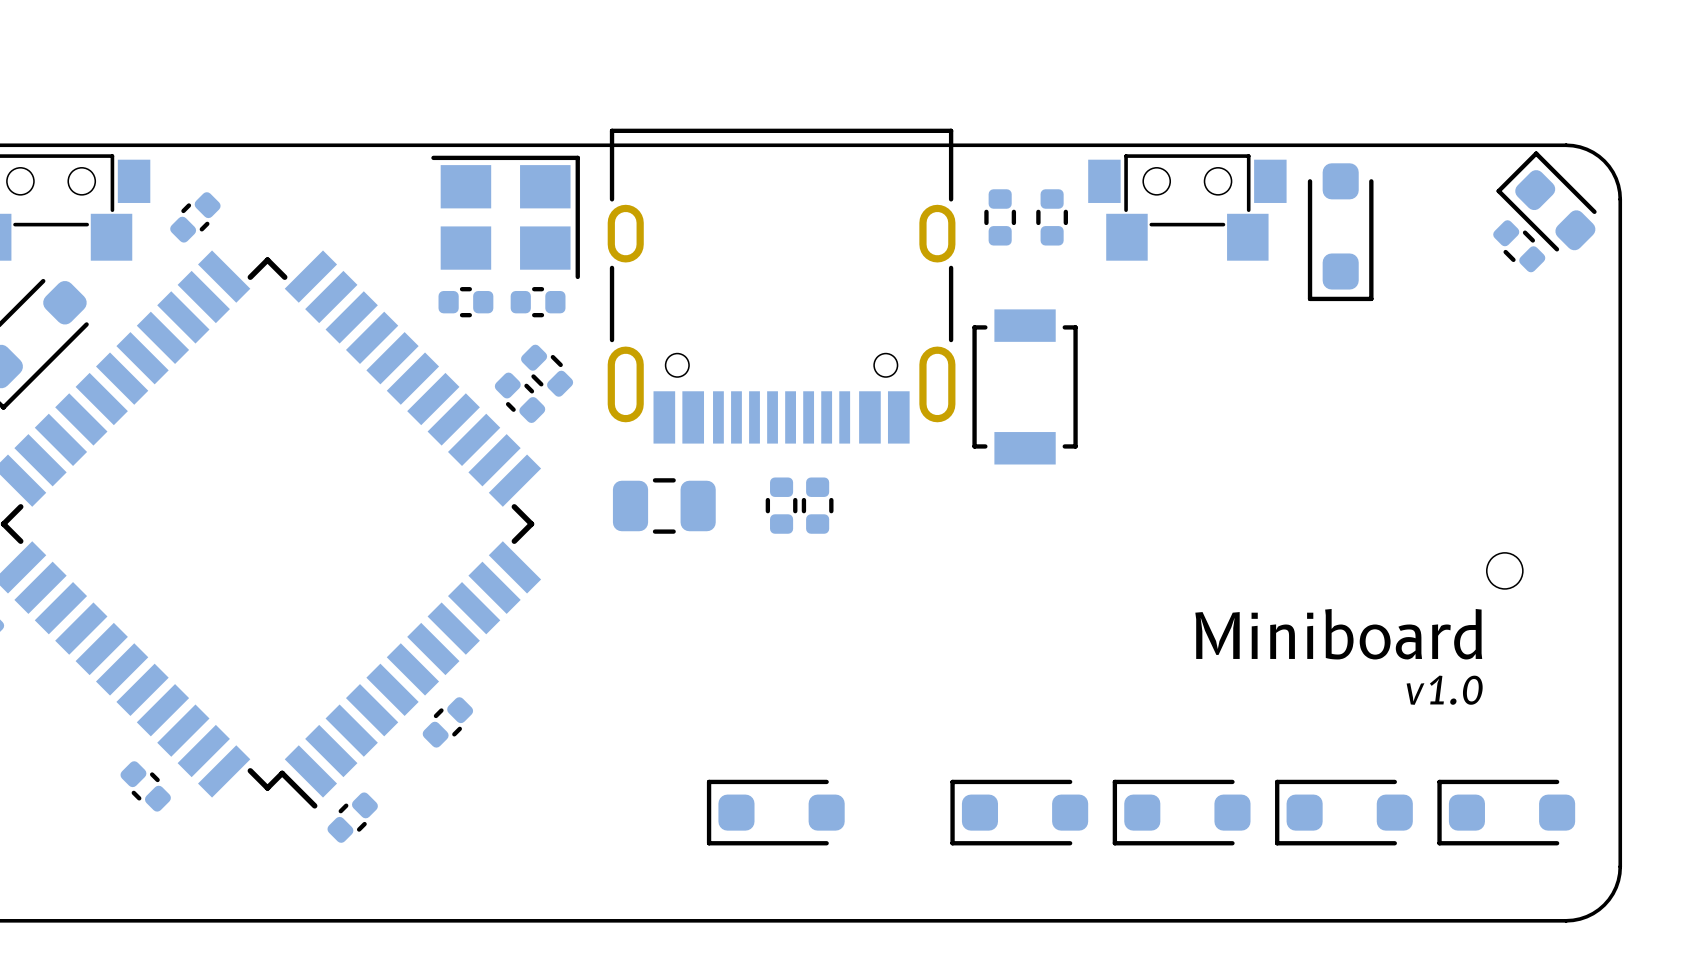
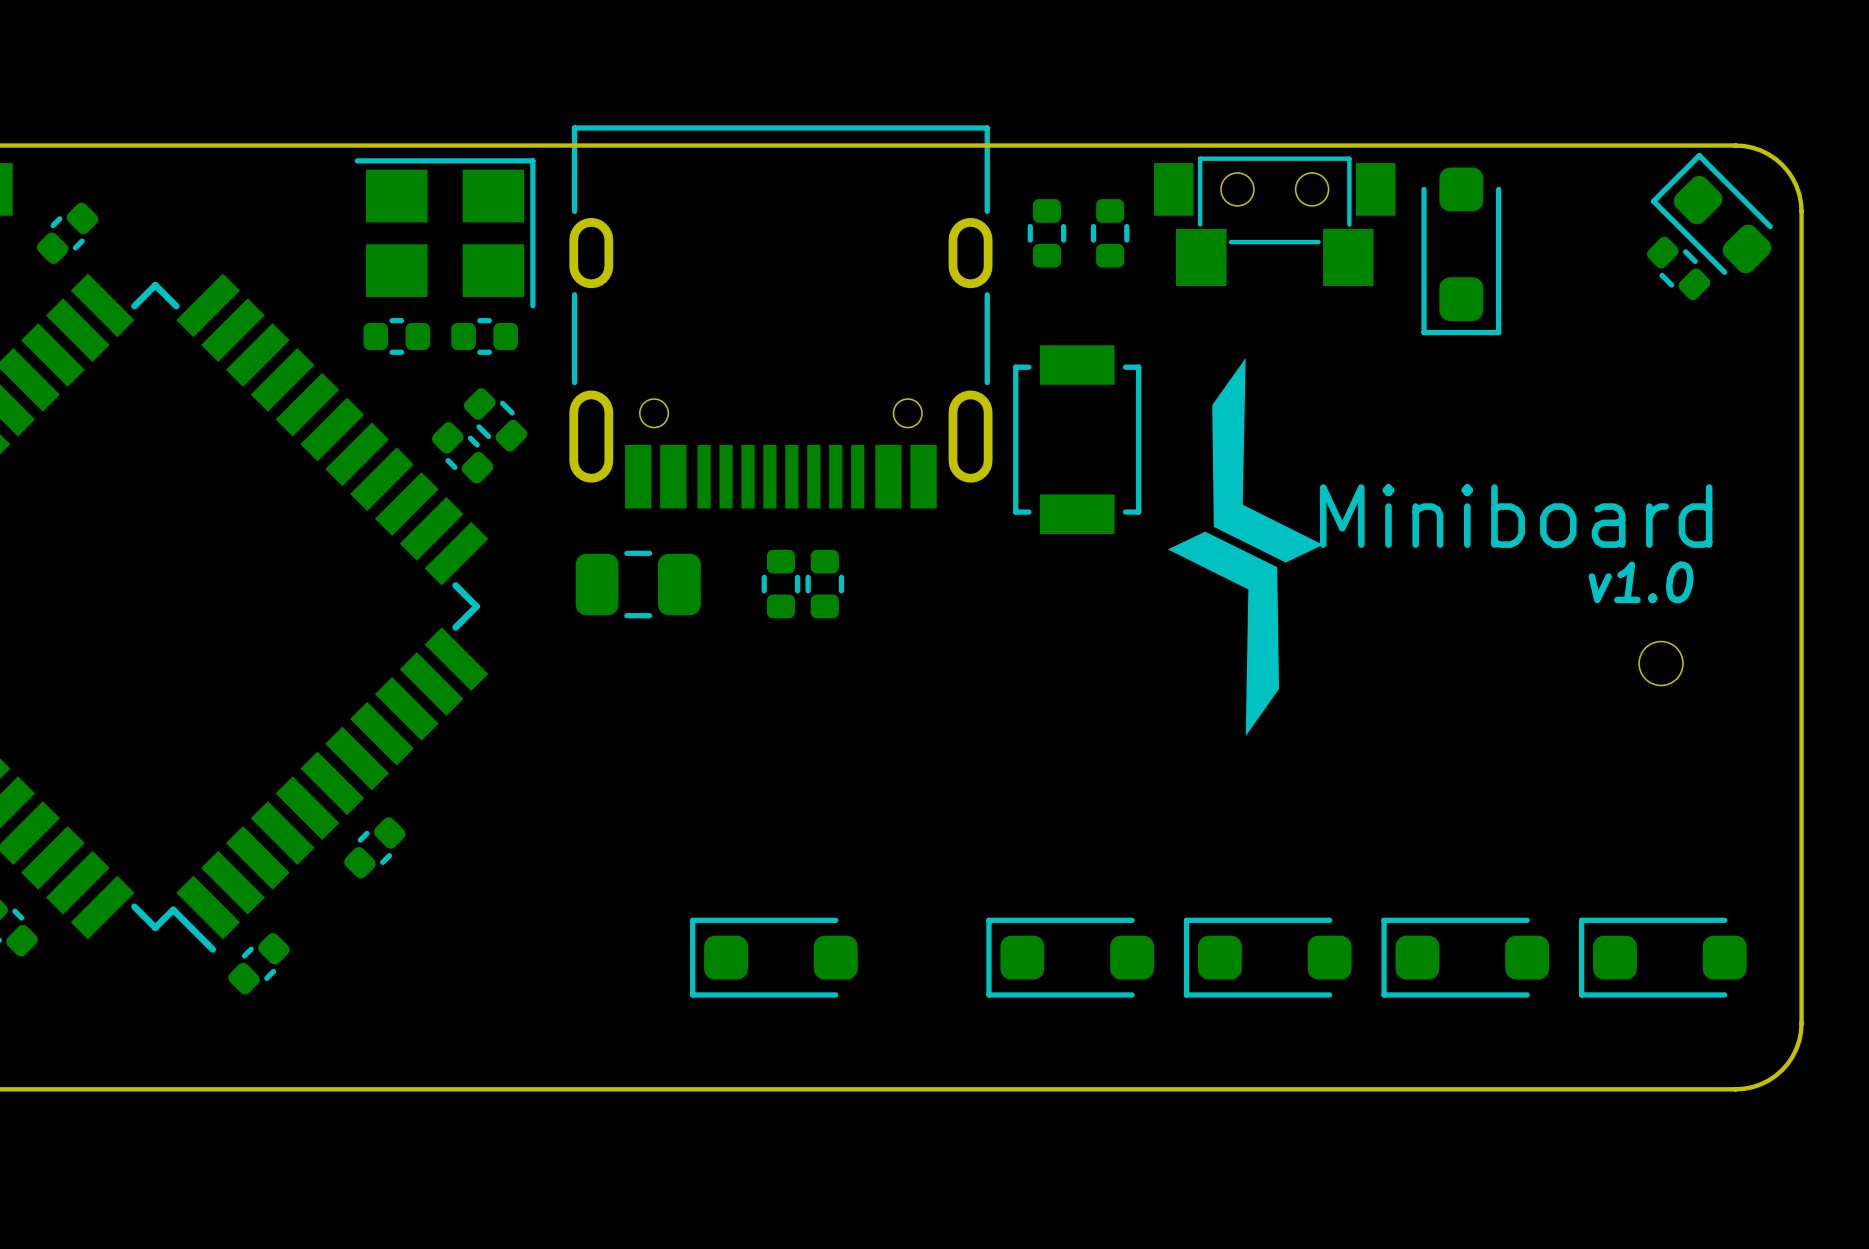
drawing: none -> [1167, 358, 1324, 737]
text position: Miniboard (1338, 634) -> Miniboard (1516, 516)
text position: v1.0 (1444, 690) -> v1.0 (1641, 582)

